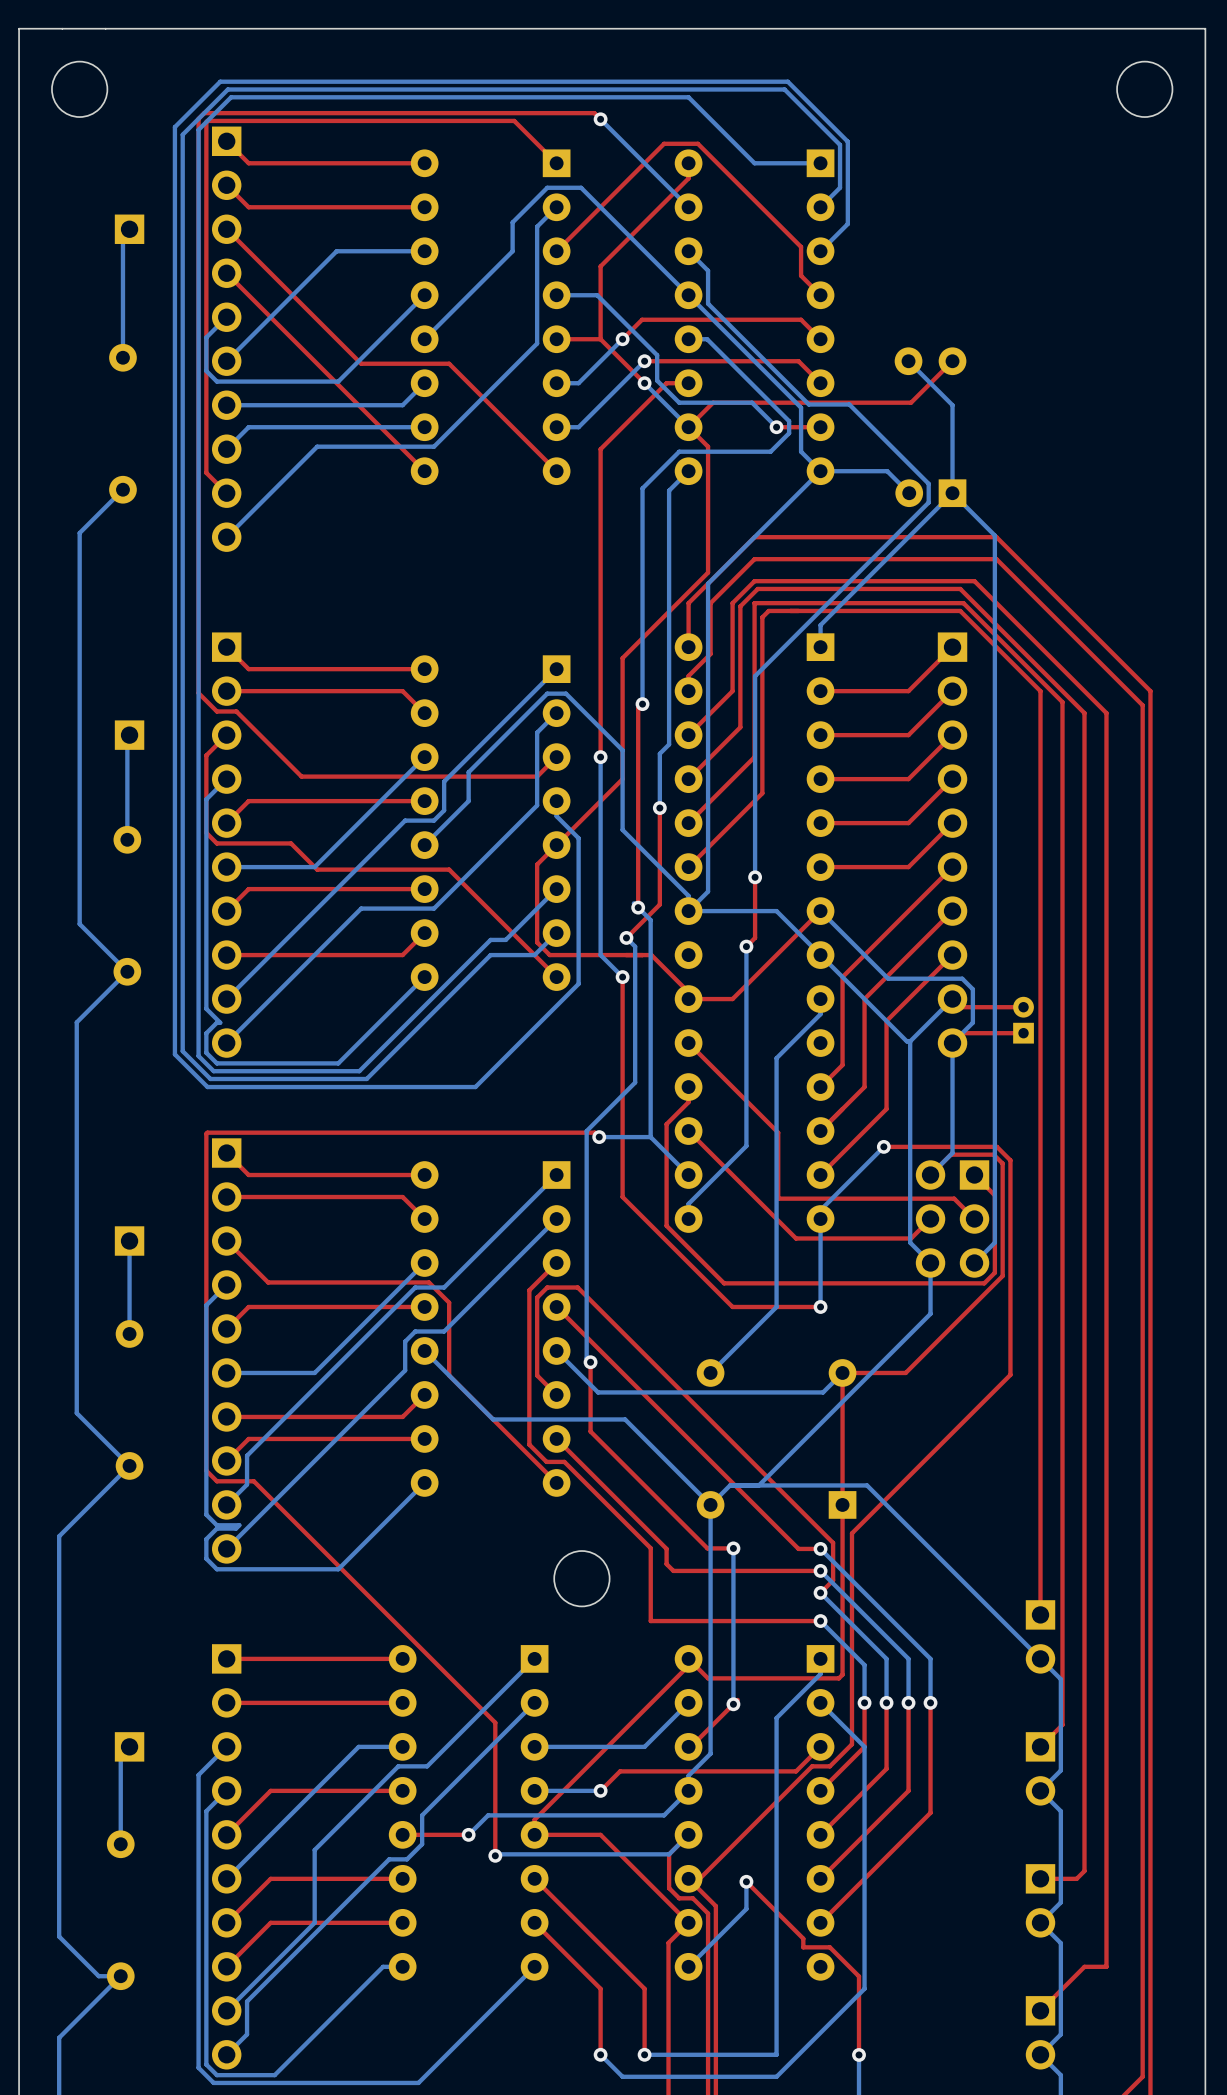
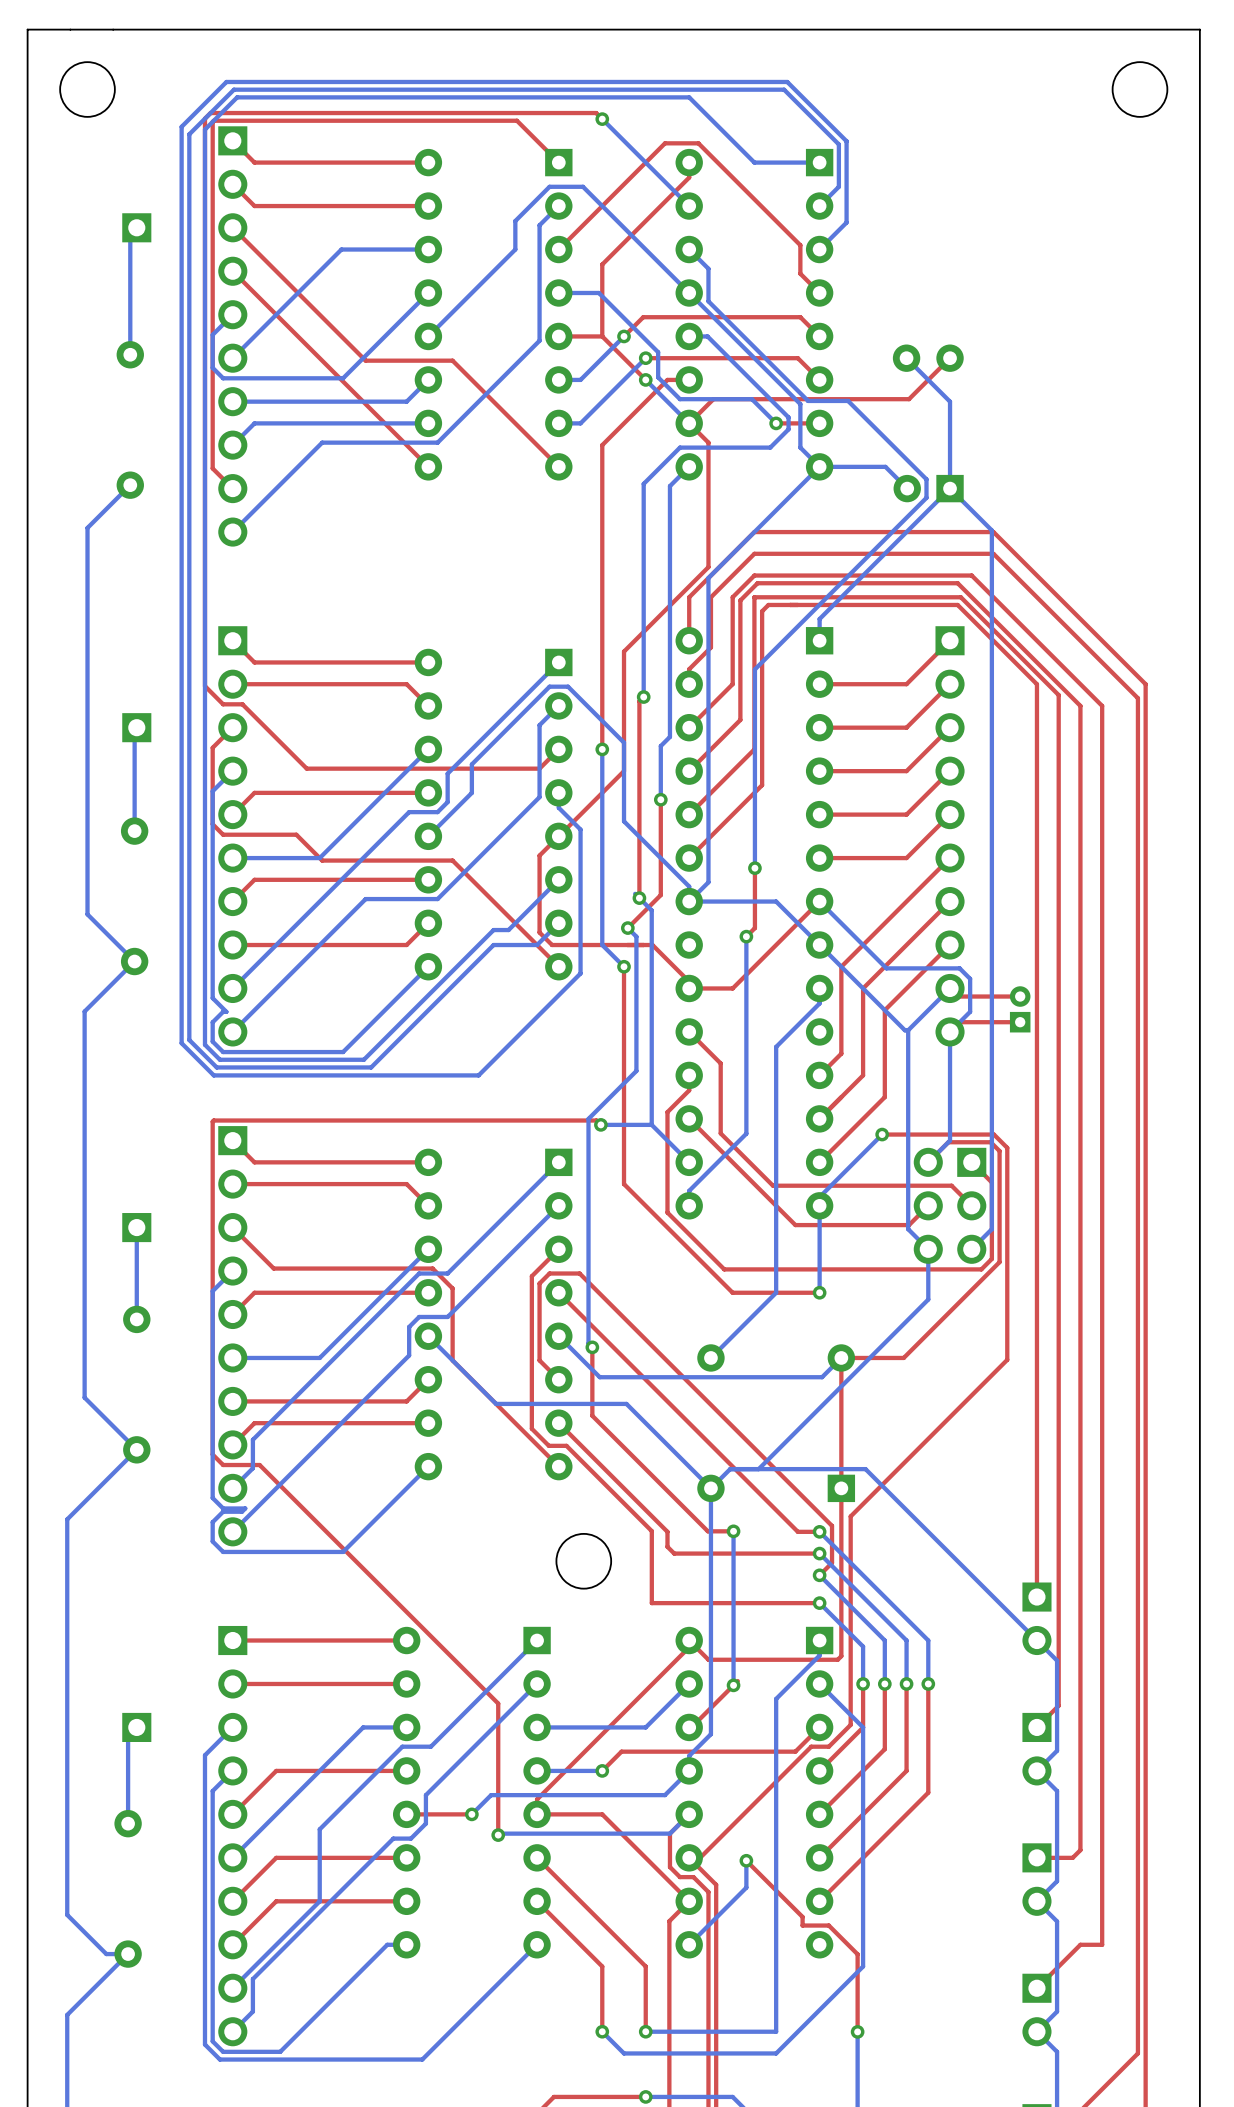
top track: (720, 1074) (778, 1132) (778, 1198) -> (720, 1063) (720, 1133) (772, 1185) (777, 1185)

